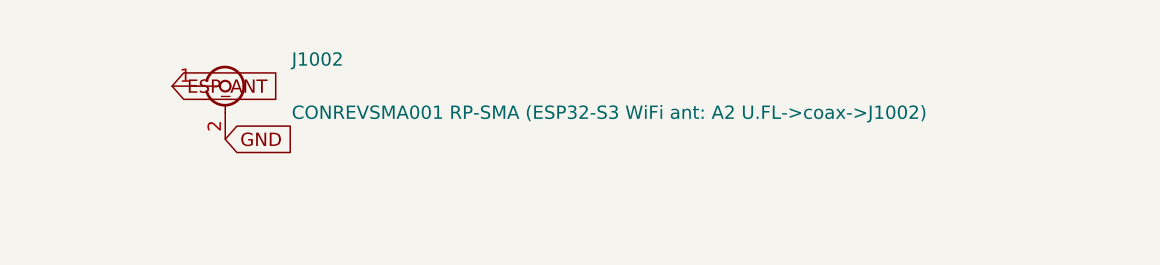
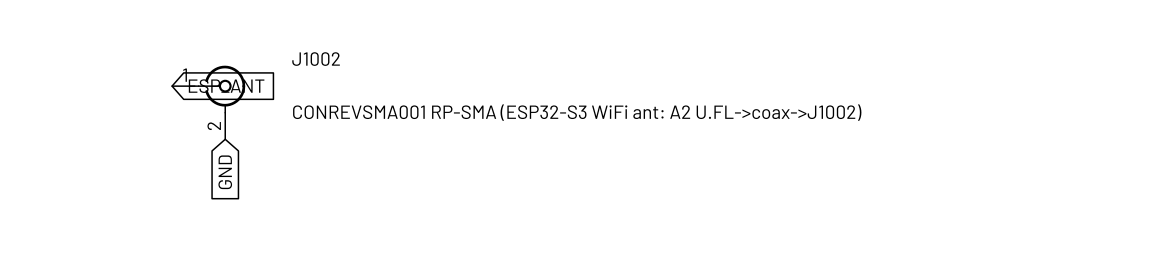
global label rotation: 0° (261, 139) -> 90° clockwise (225, 172)

